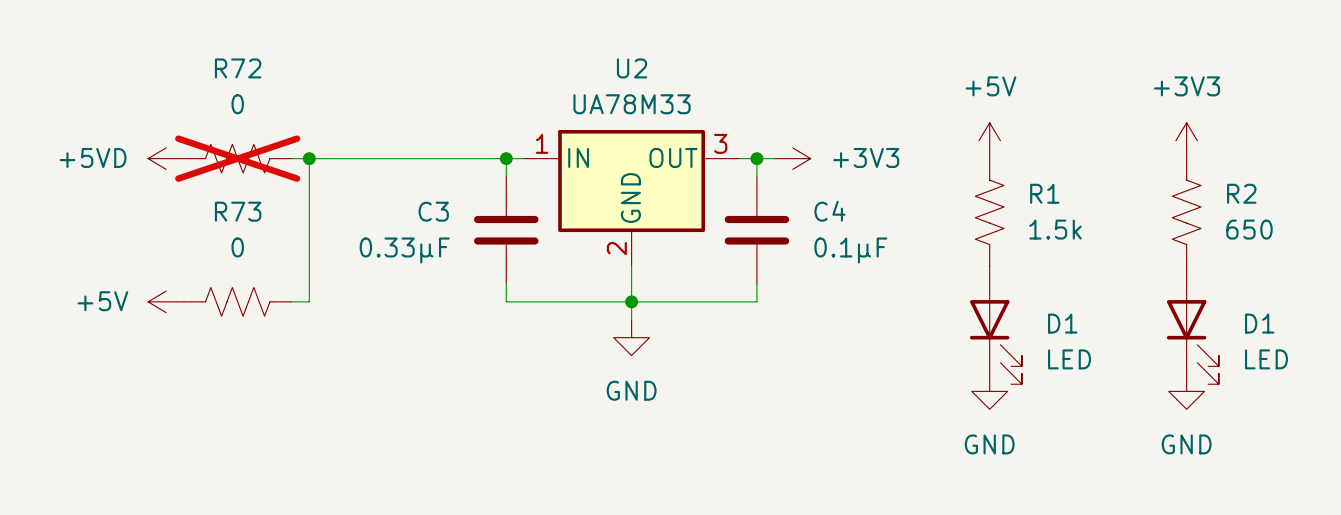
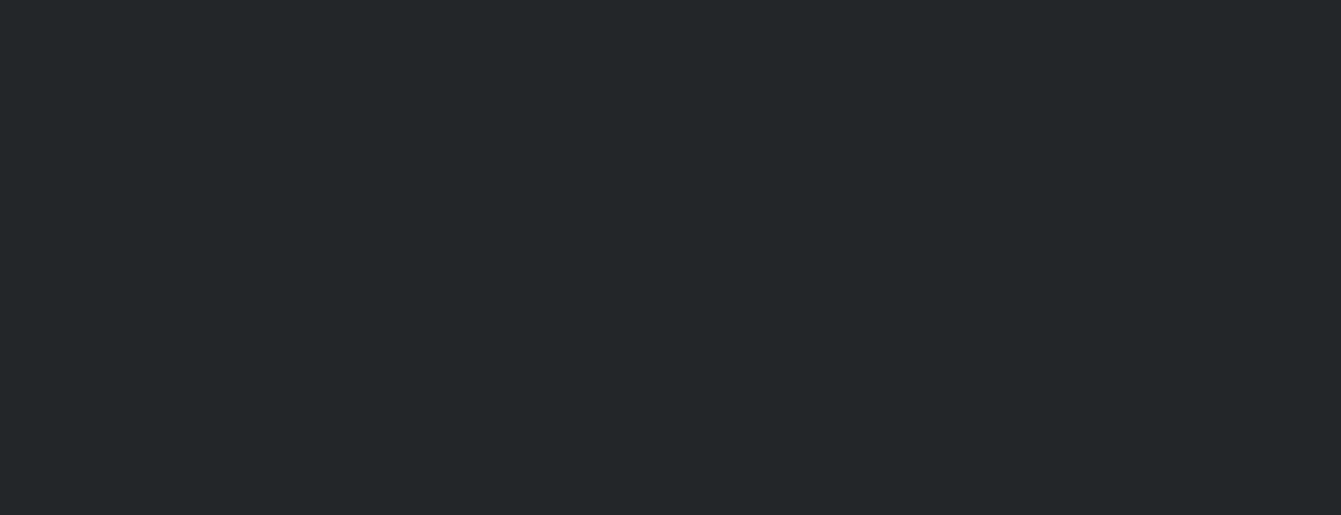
power symbol: +5V (989, 140) -> none
power symbol: +3V3 (1186, 140) -> none
power symbol: +5VD (166, 158) -> none
R72: 0 (237, 158) -> none
wire: (291, 158) (524, 158) -> none
wire: (309, 158) (309, 301) (291, 301) -> none
junction: (309, 158) -> none
wire: (506, 158) (506, 176) -> none
junction: (506, 158) -> none
wire: (739, 158) (774, 158) -> none
wire: (756, 158) (756, 176) -> none
junction: (756, 158) -> none
power symbol: +3V3 (792, 158) -> none
U2: UA78M33 (631, 198) -> none
R1: 1.5k (989, 212) -> none
R2: 650 (1186, 212) -> none
C3: 0.33μF (506, 230) -> none
C4: 0.1μF (756, 230) -> none
wire: (631, 266) (631, 319) -> none
wire: (506, 283) (506, 301) (756, 301) (756, 283) -> none
power symbol: +5V (166, 301) -> none
R73: 0 (237, 301) -> none
junction: (631, 301) -> none
D1: LED (995, 325) -> none
D1: LED (1192, 325) -> none
power symbol: GND (631, 337) -> none
power symbol: GND (989, 391) -> none
power symbol: GND (1186, 391) -> none

